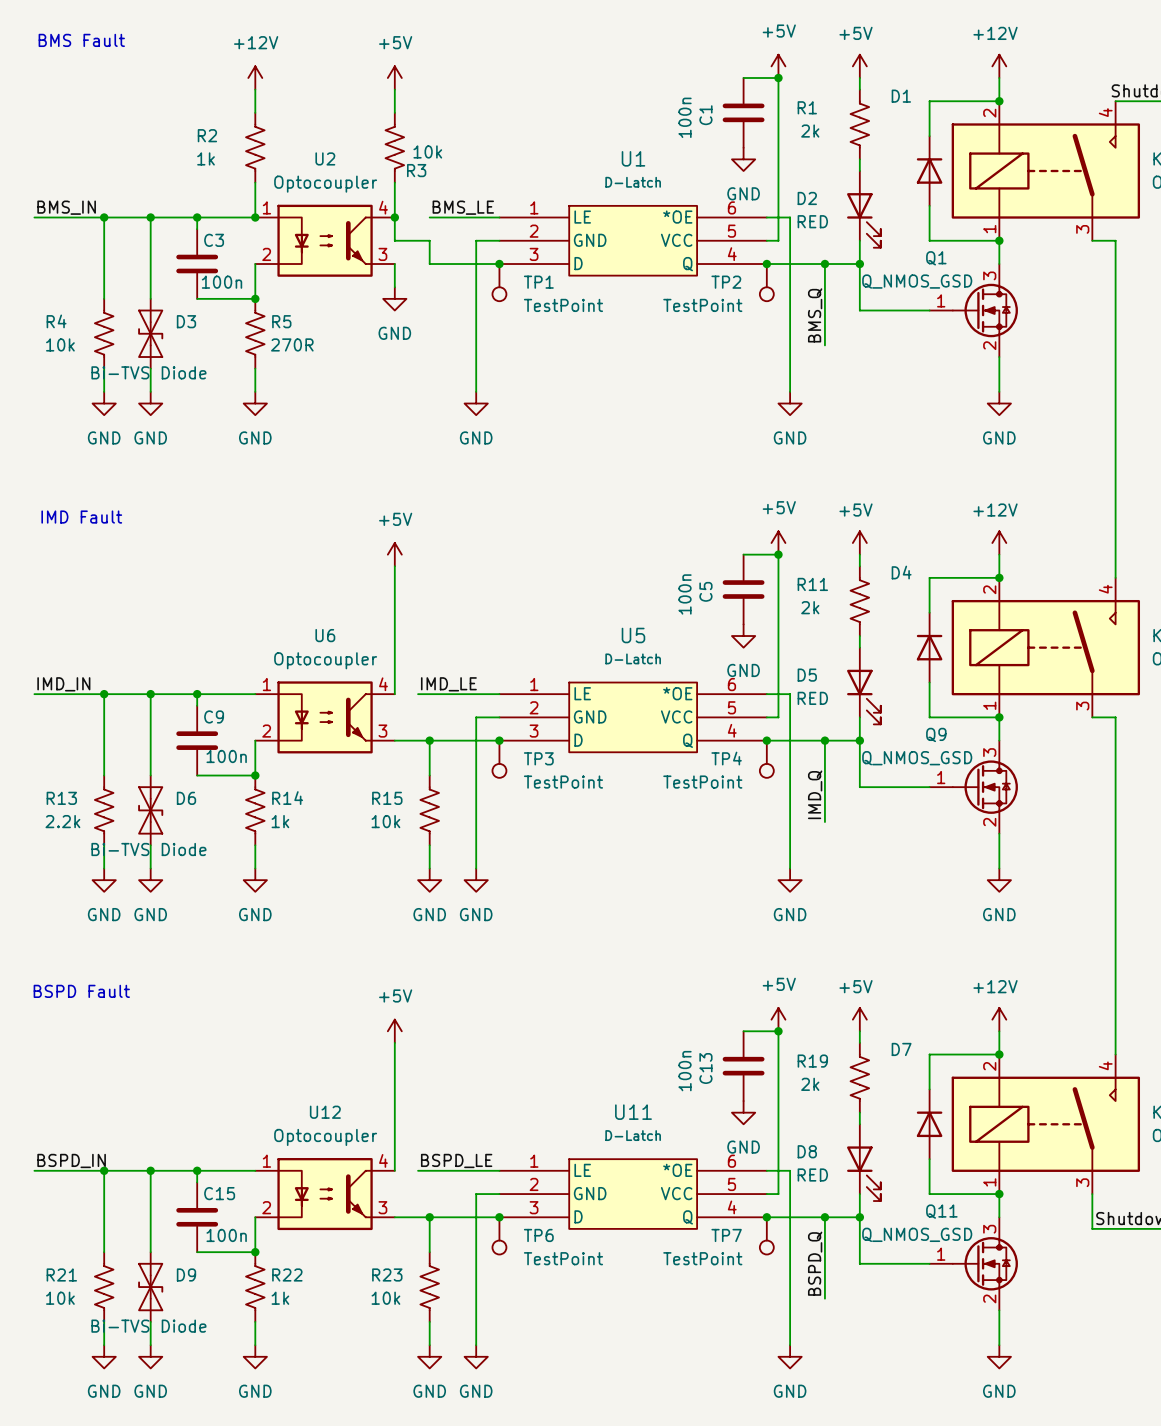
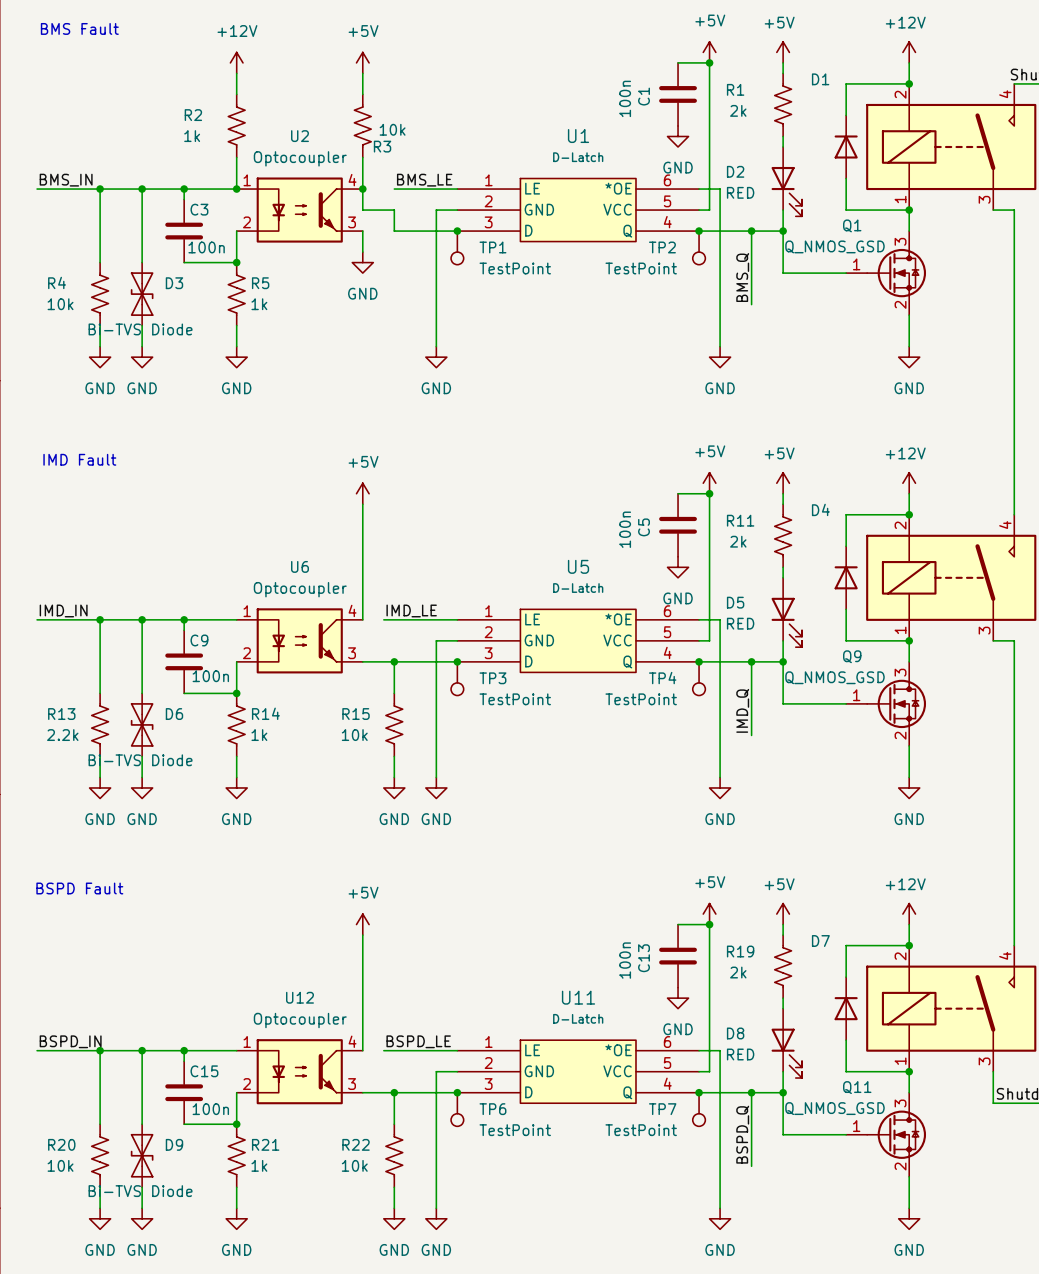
R5 value: 270R (292, 344) -> 1k (259, 304)
R21 name: R21 (61, 1274) -> R20 (61, 1144)
R22 name: R22 (287, 1274) -> R21 (265, 1144)
R23 name: R23 (387, 1274) -> R22 (356, 1144)

